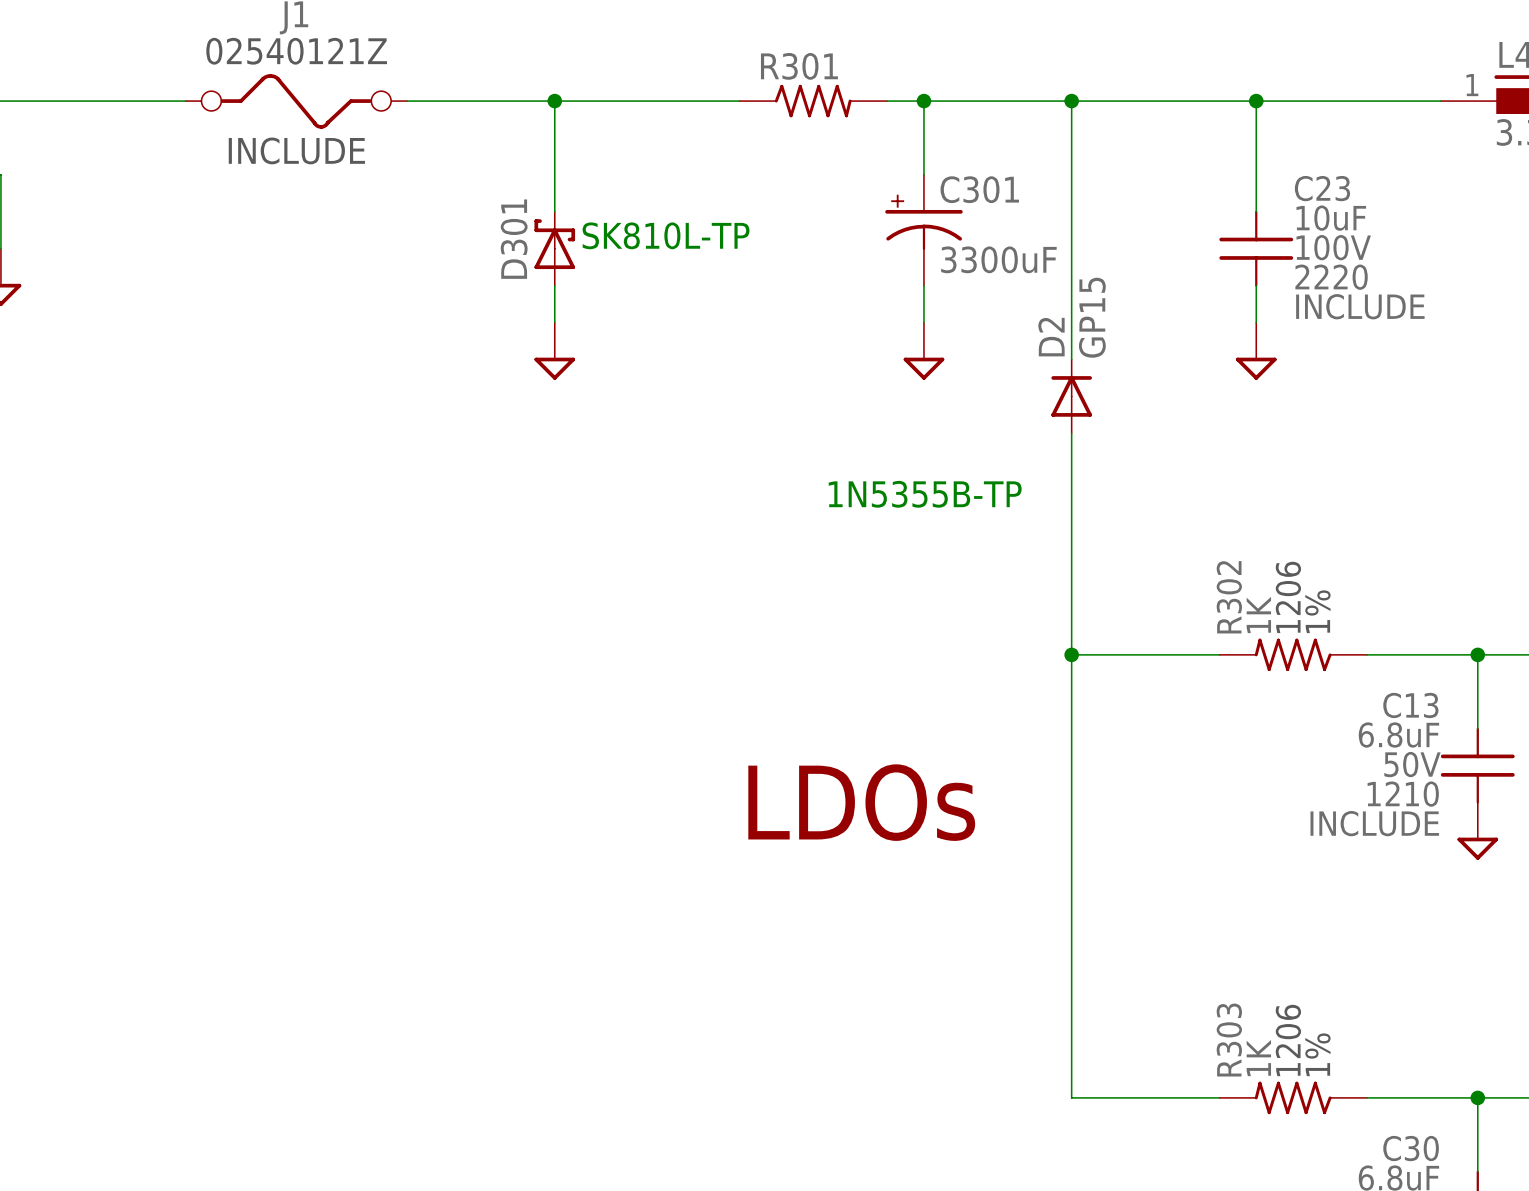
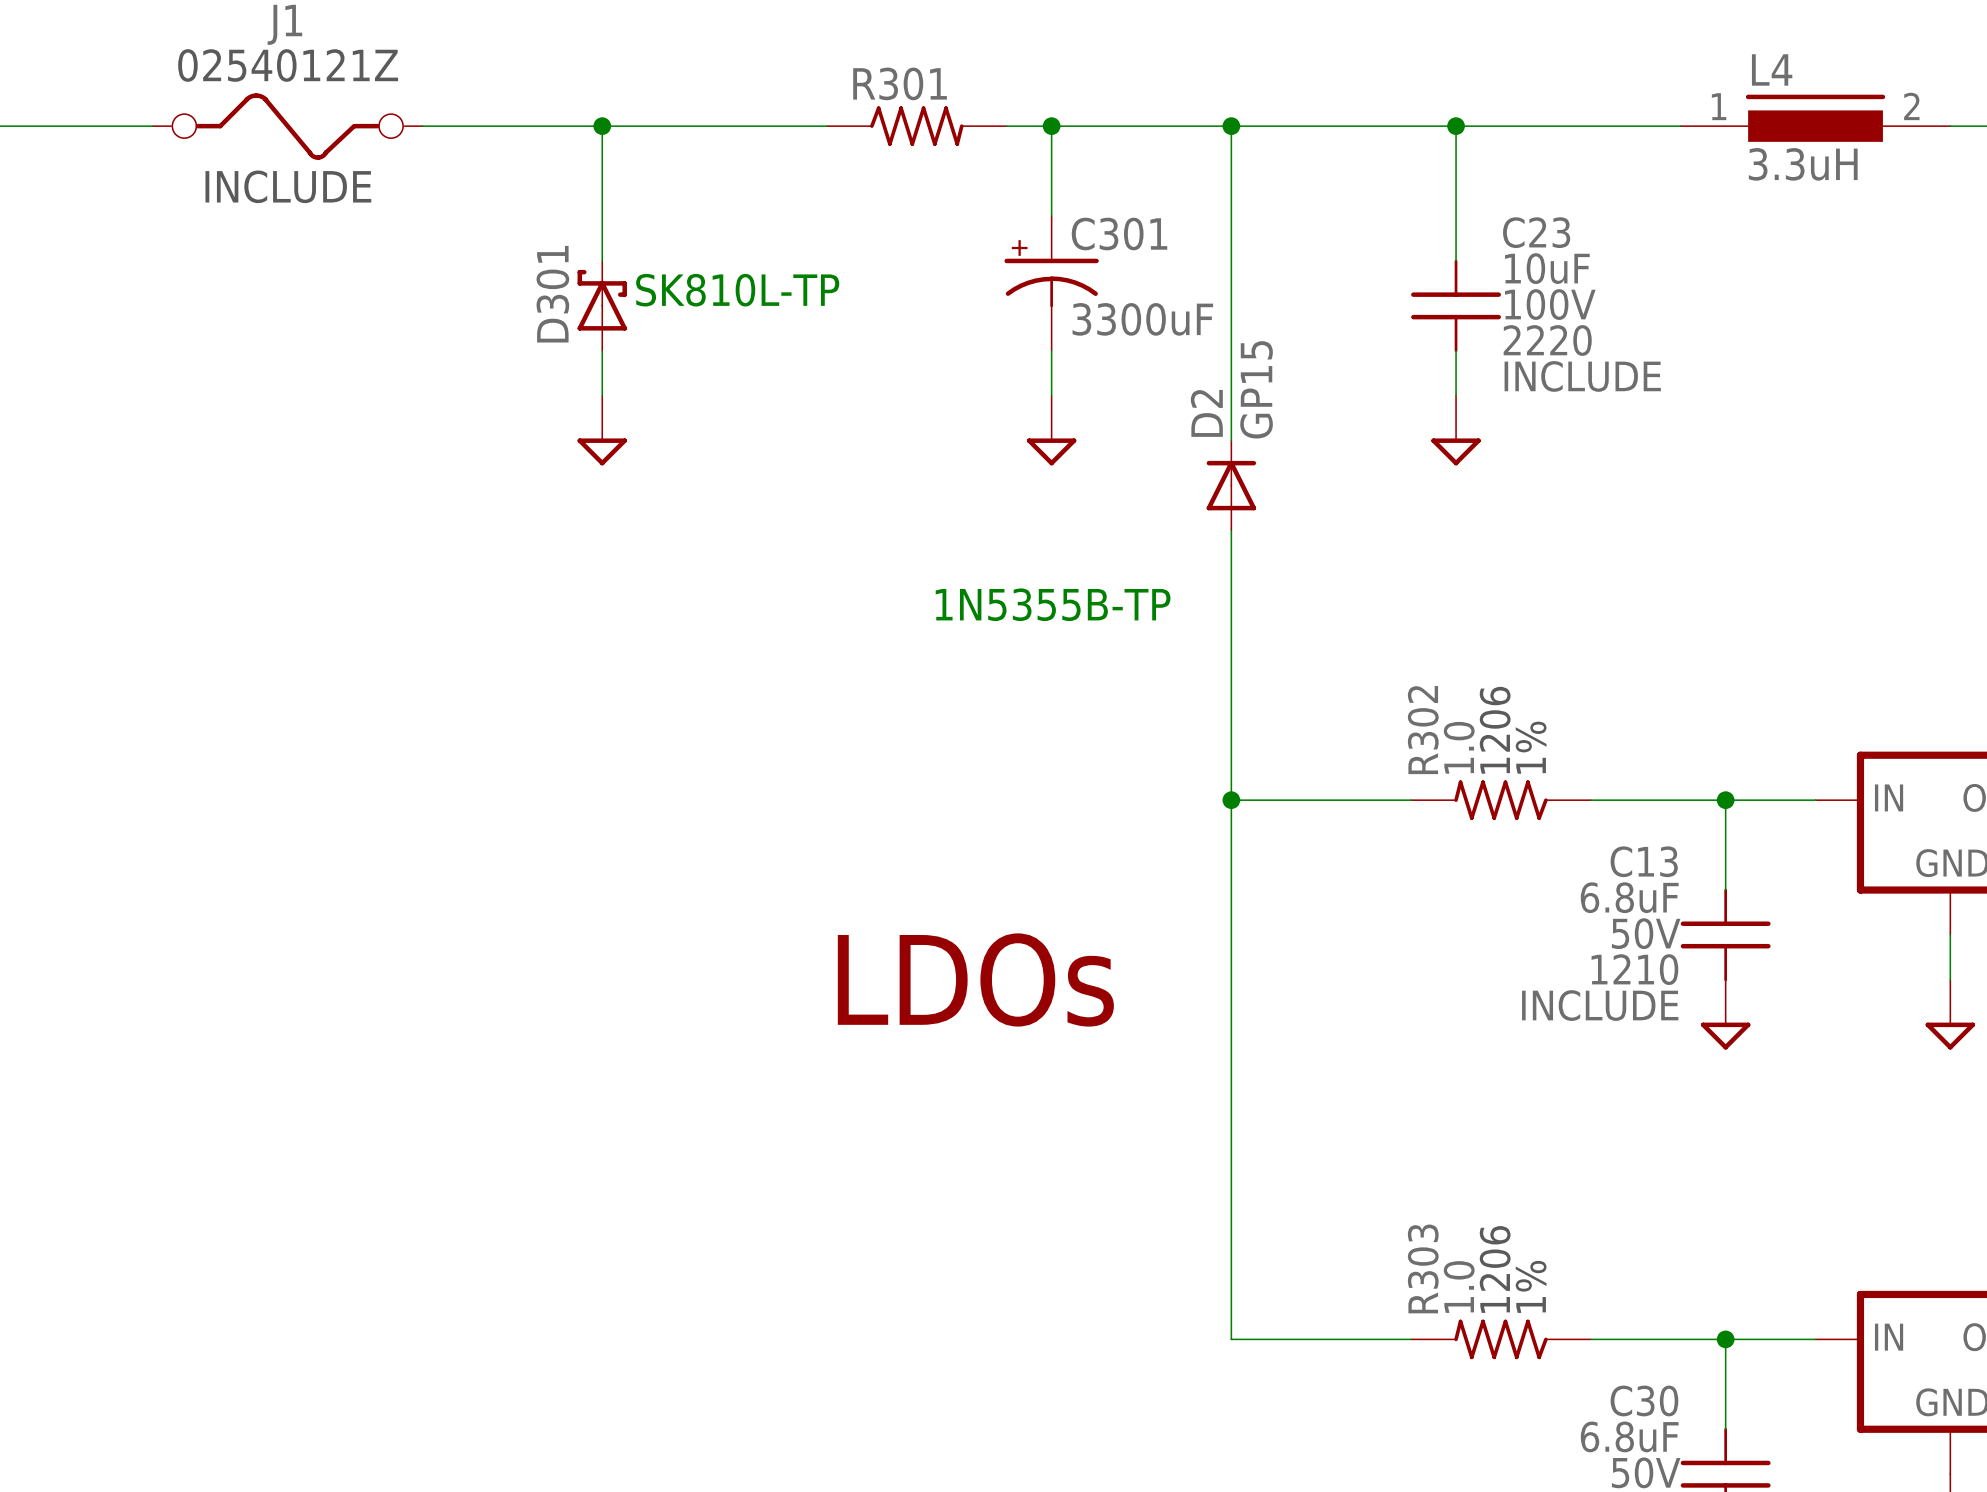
R302 value: 1K (1258, 615) -> 1.0 (1459, 747)
R303 value: 1K (1258, 1058) -> 1.0 (1459, 1287)

